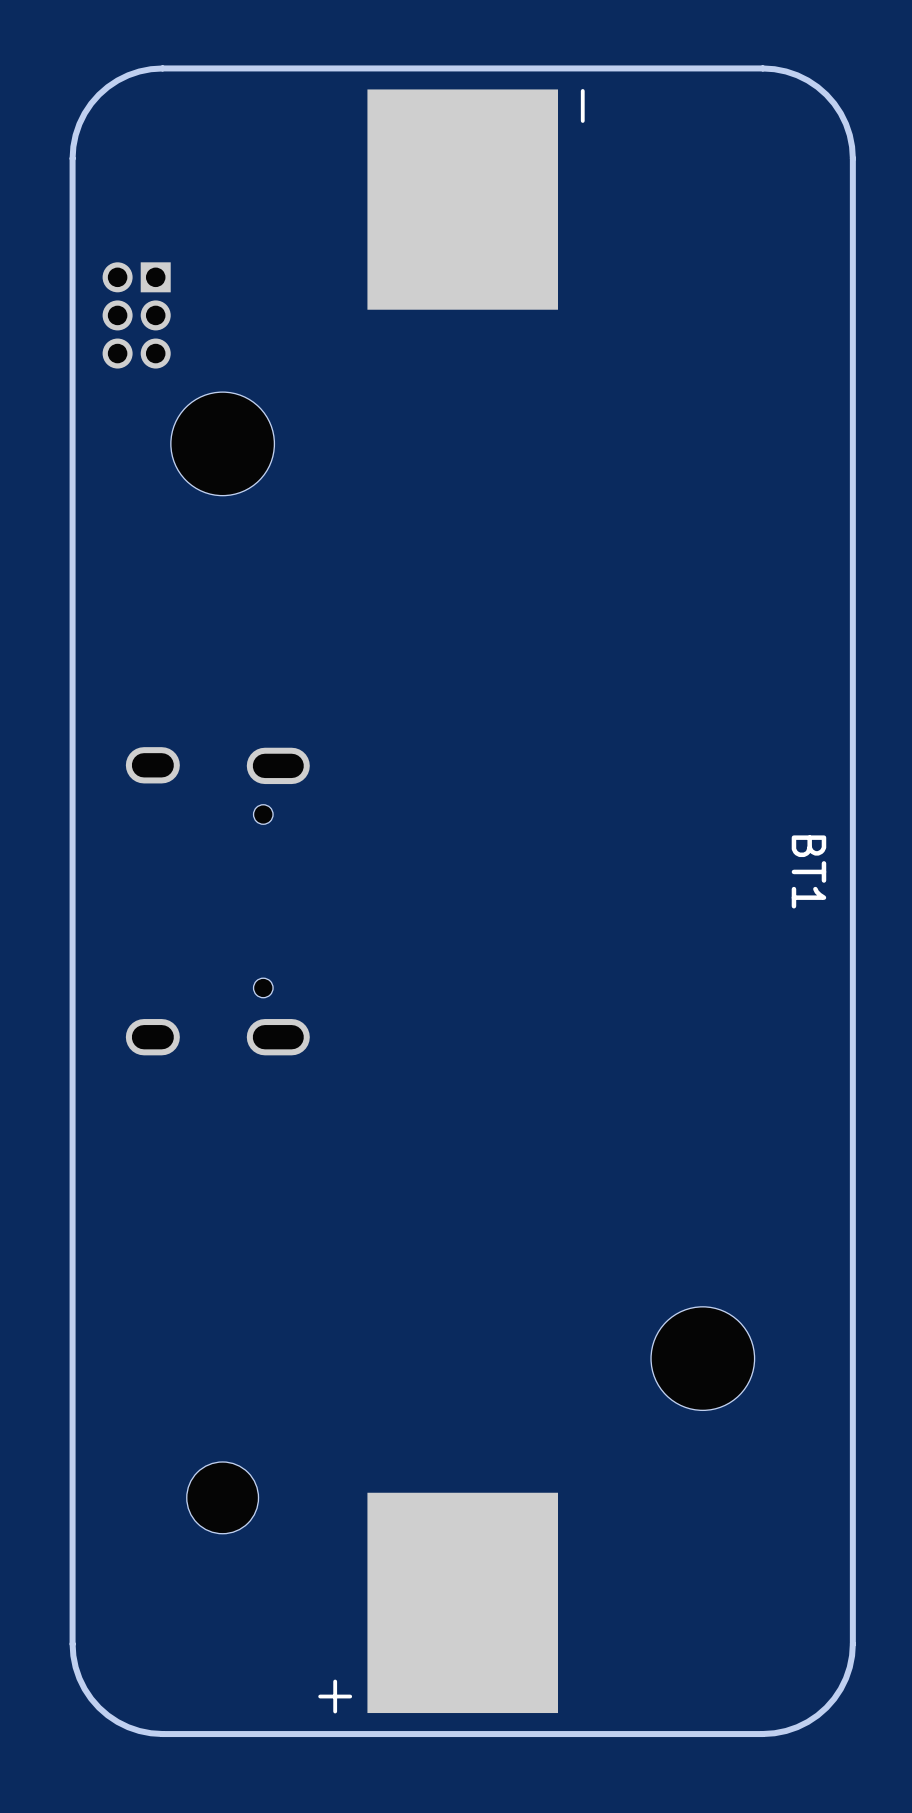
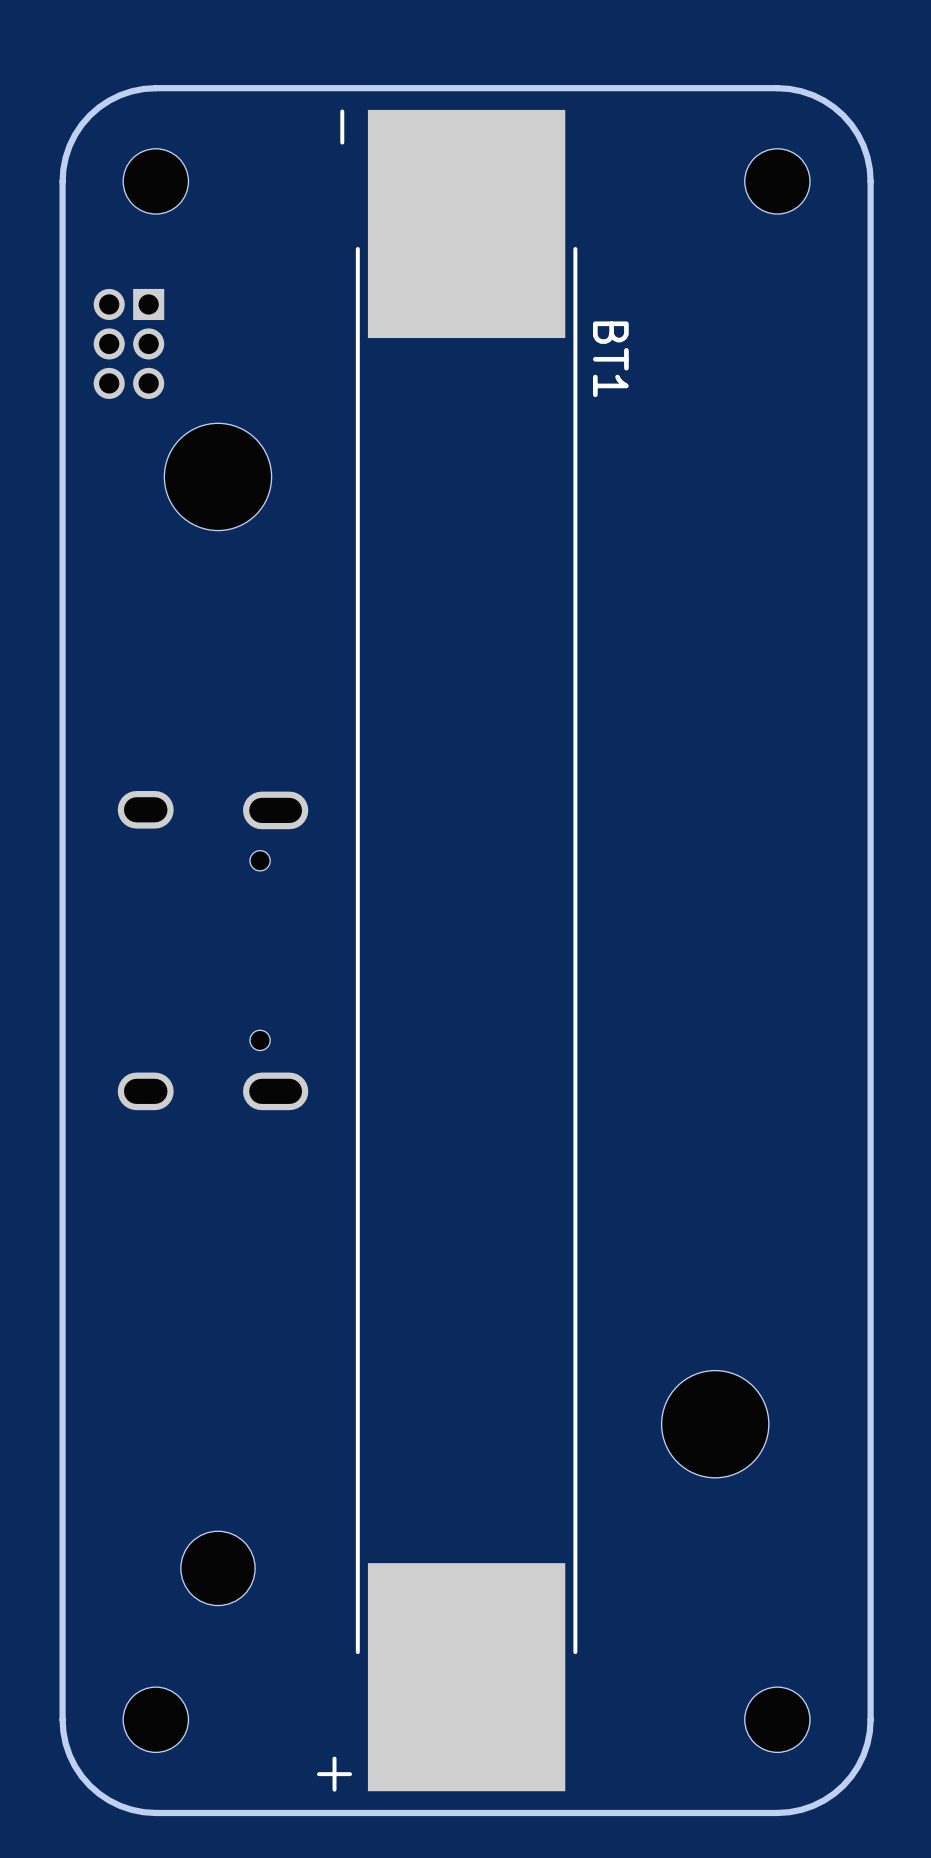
BT1 footprint: [170, 89, 755, 1714] -> [164, 109, 769, 1792]
part: none -> (155, 181)
part: none -> (777, 181)
BT1 name position: BT1 (808, 871) -> BT1 (610, 359)
part: none -> (155, 1719)
part: none -> (777, 1719)

